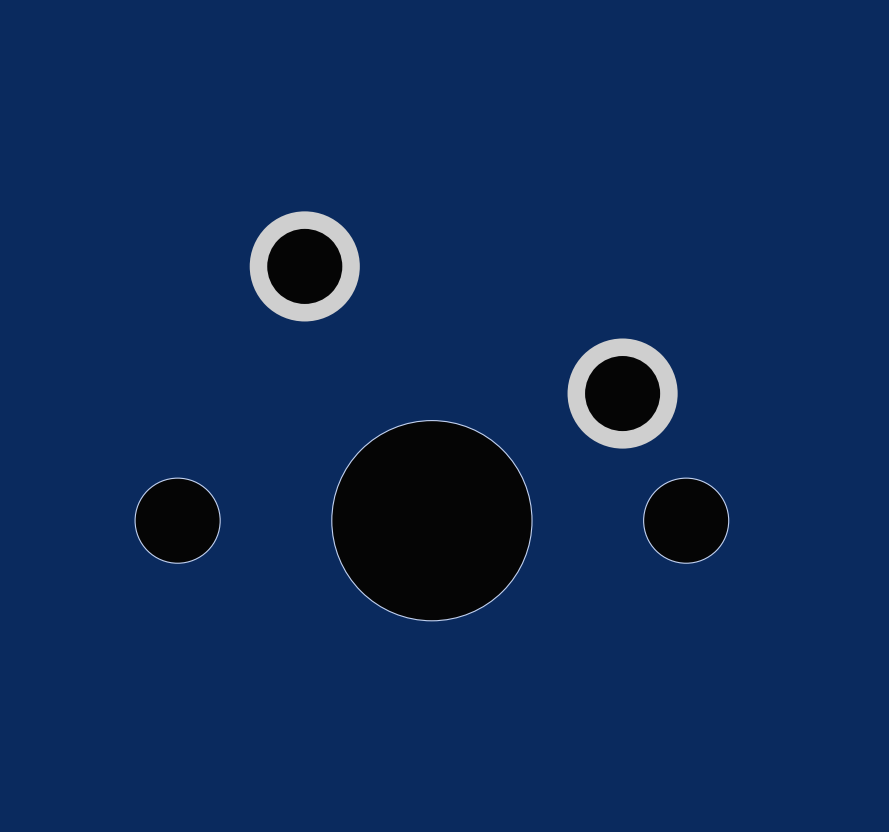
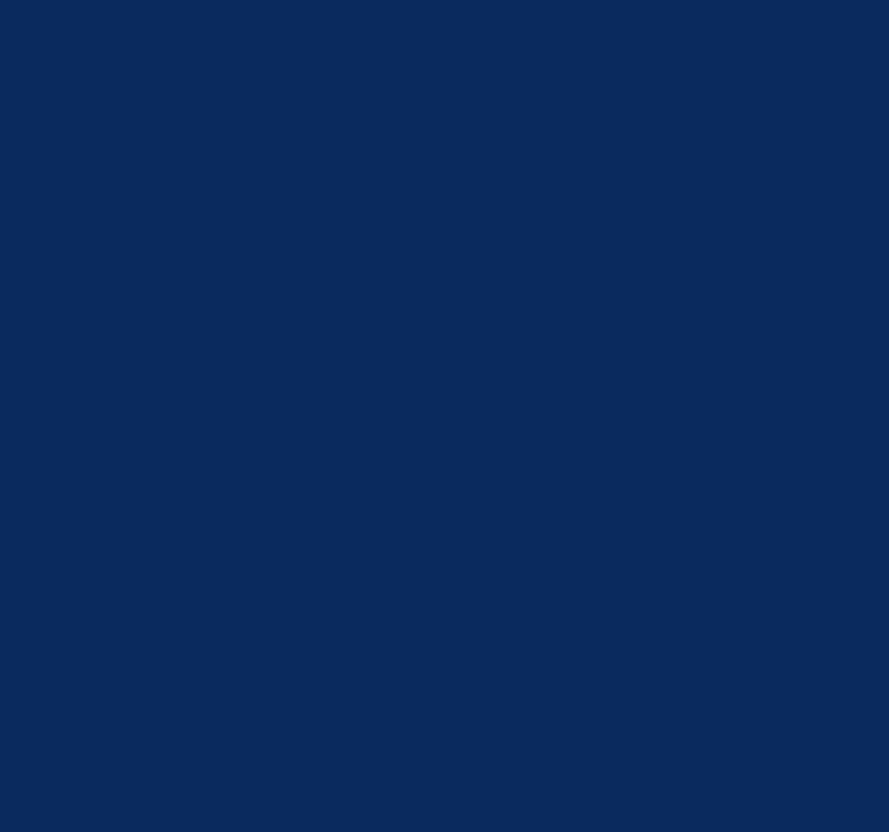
part: (431, 416) -> none

